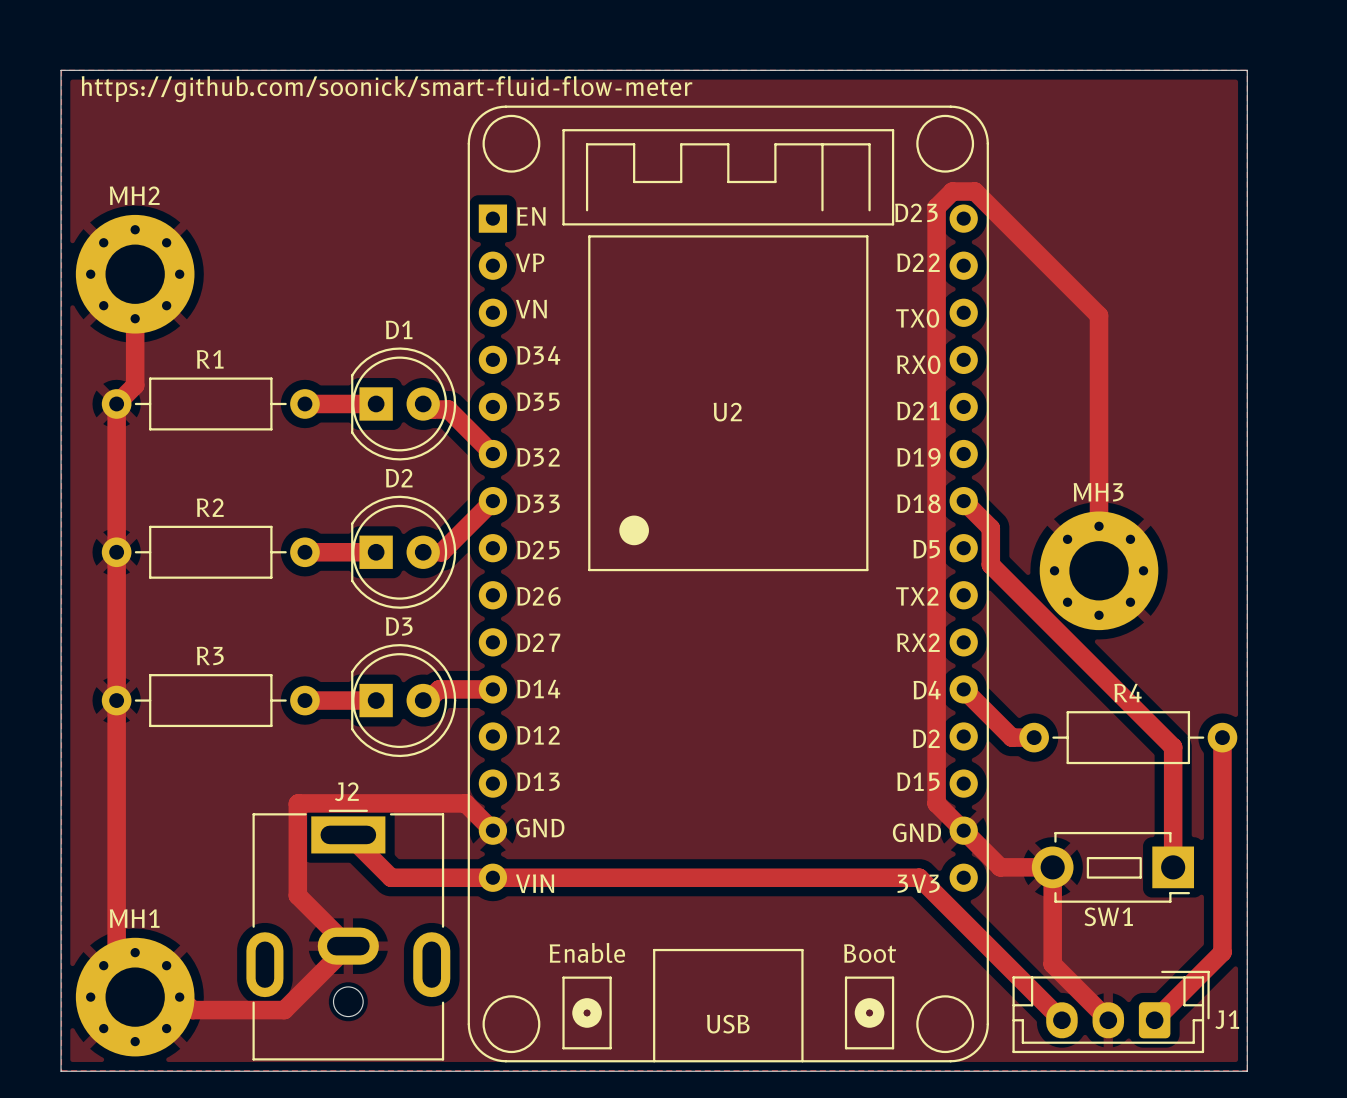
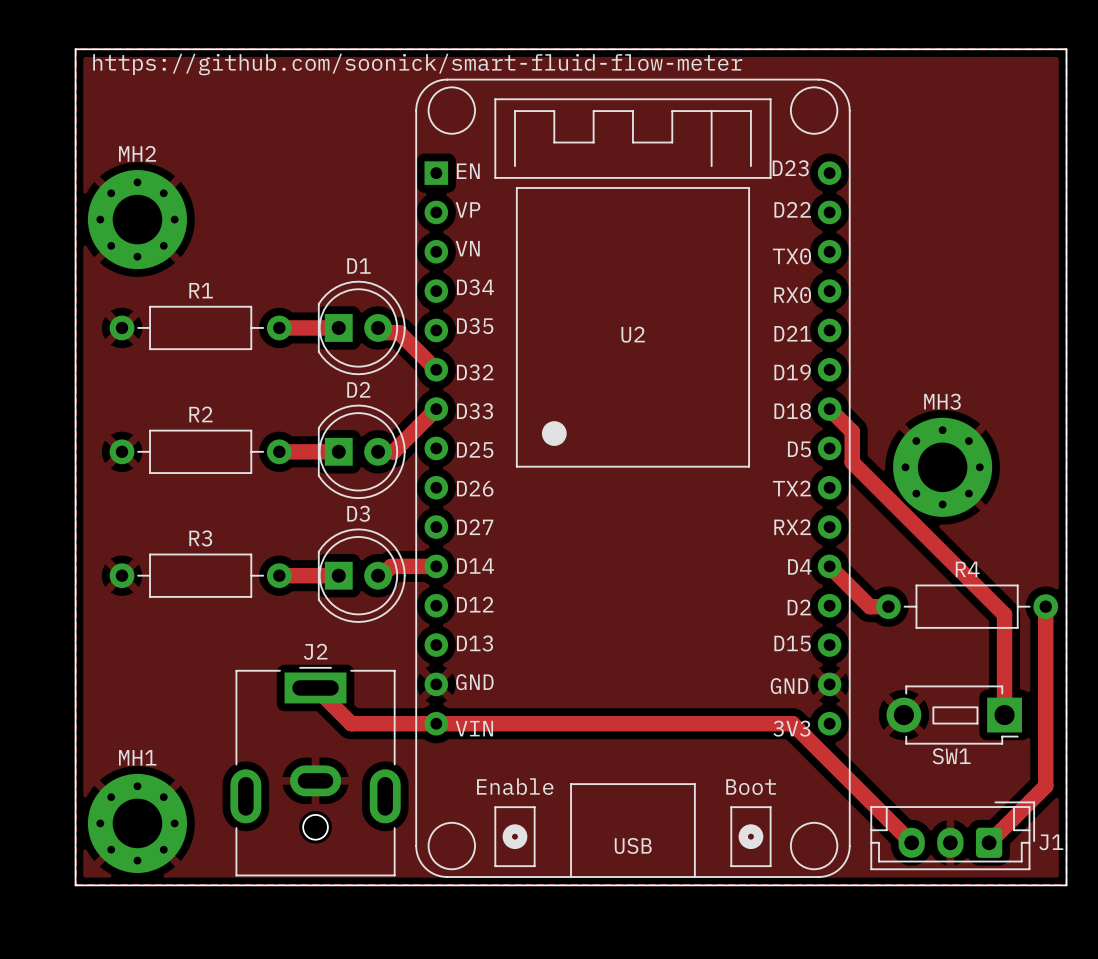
track: (135, 318) (135, 385) (116, 403) (116, 978) -> none
track: (1099, 526) (1099, 315) (974, 191) (952, 191) (936, 207) (936, 803) (1000, 867) (1052, 867) (1052, 964) (1108, 1019) -> none
track: (492, 830) (465, 803) (298, 803) (297, 895) (348, 946) (284, 1010) (192, 1010) (179, 997) -> none

